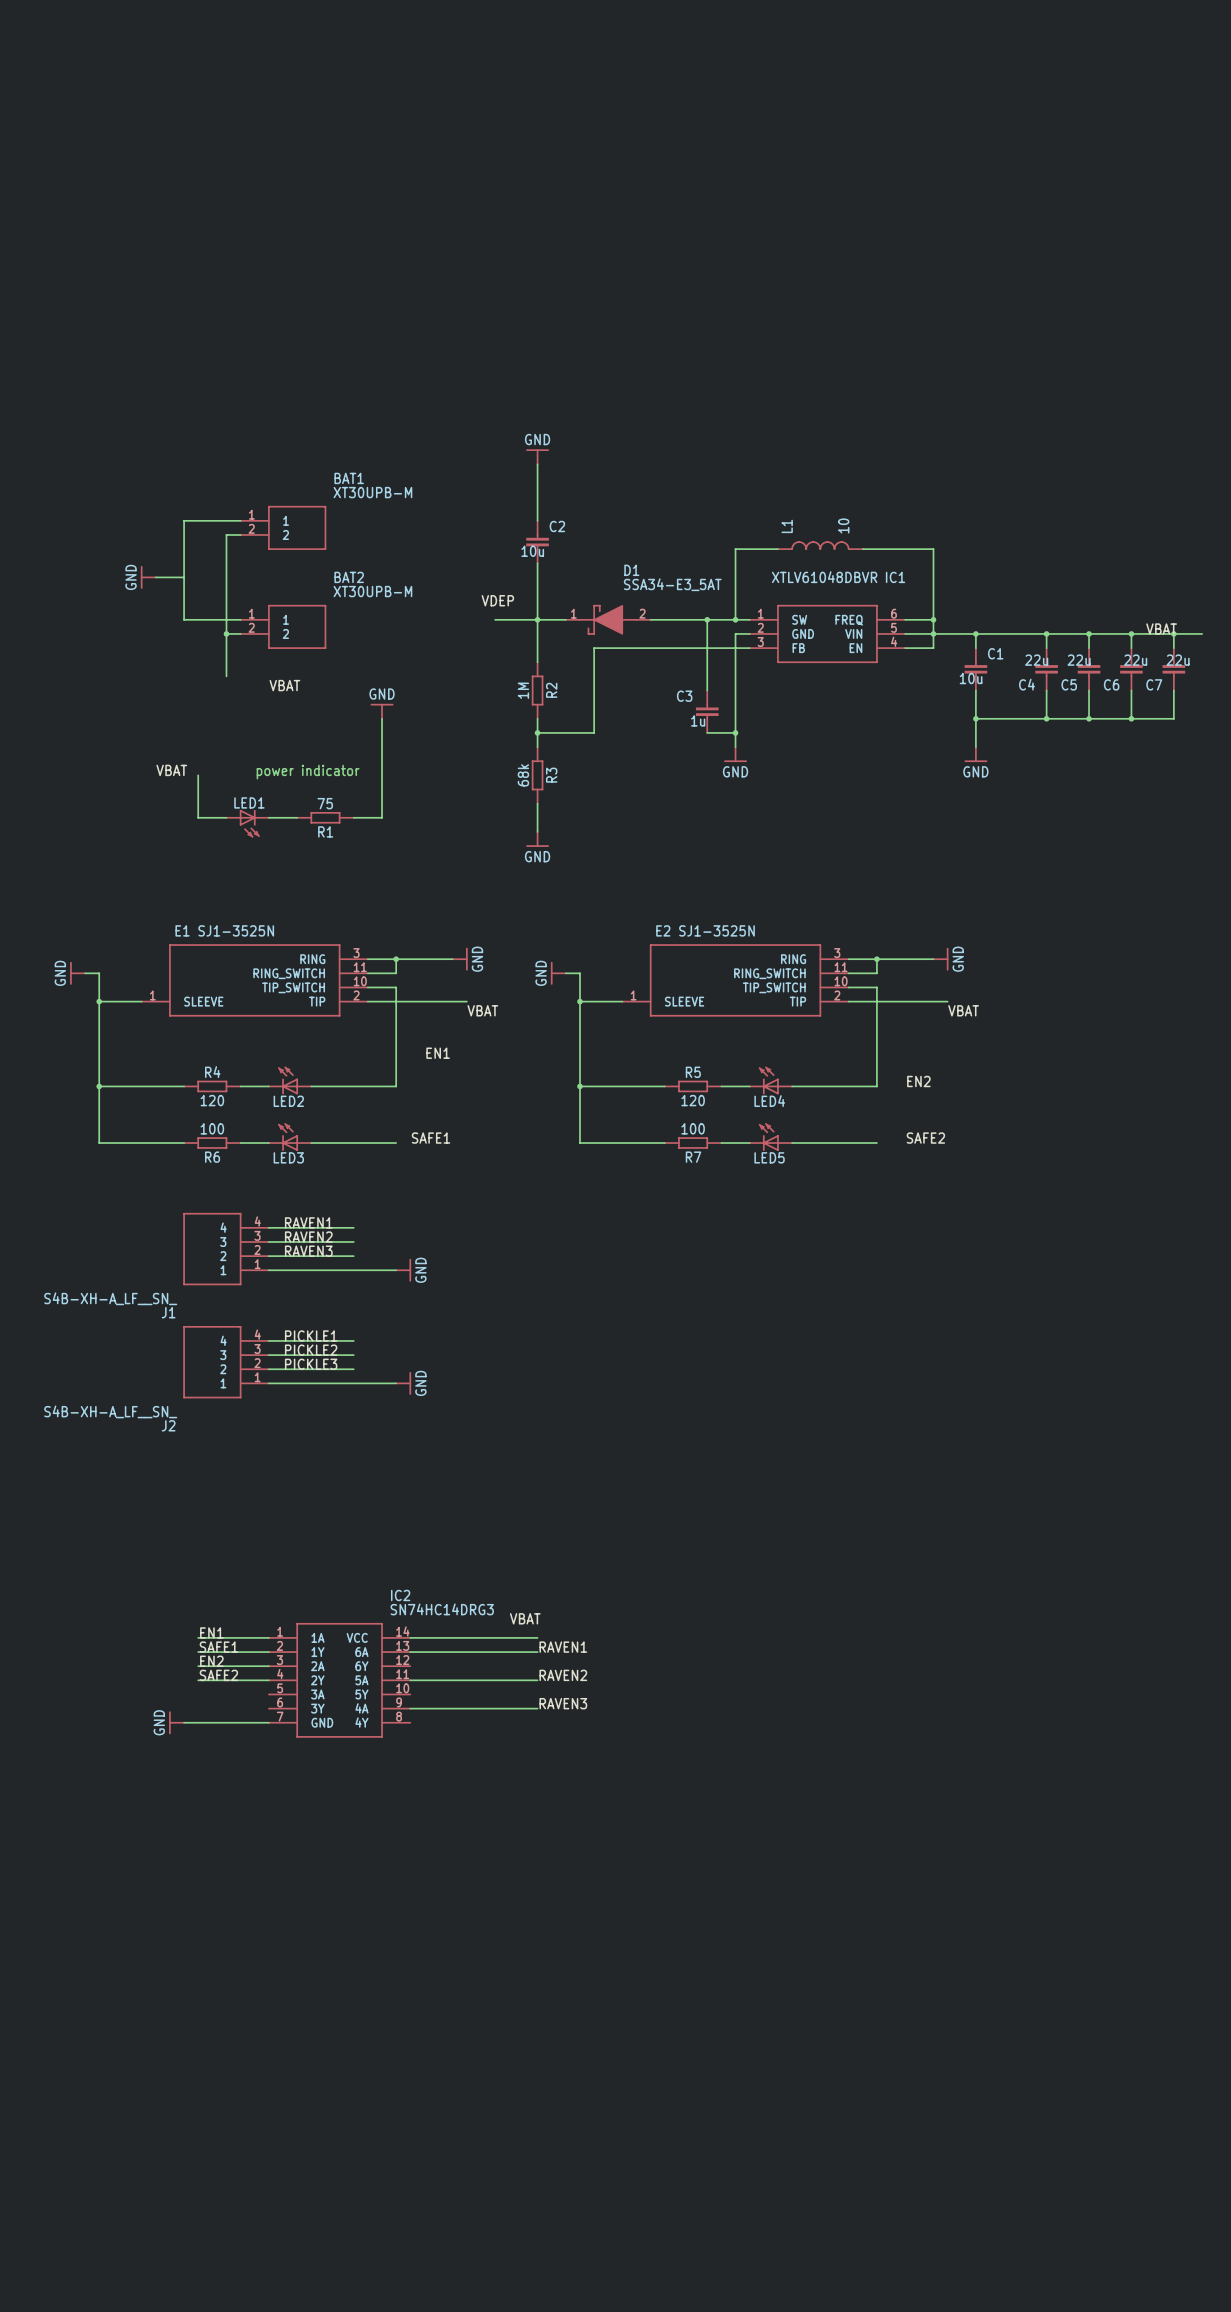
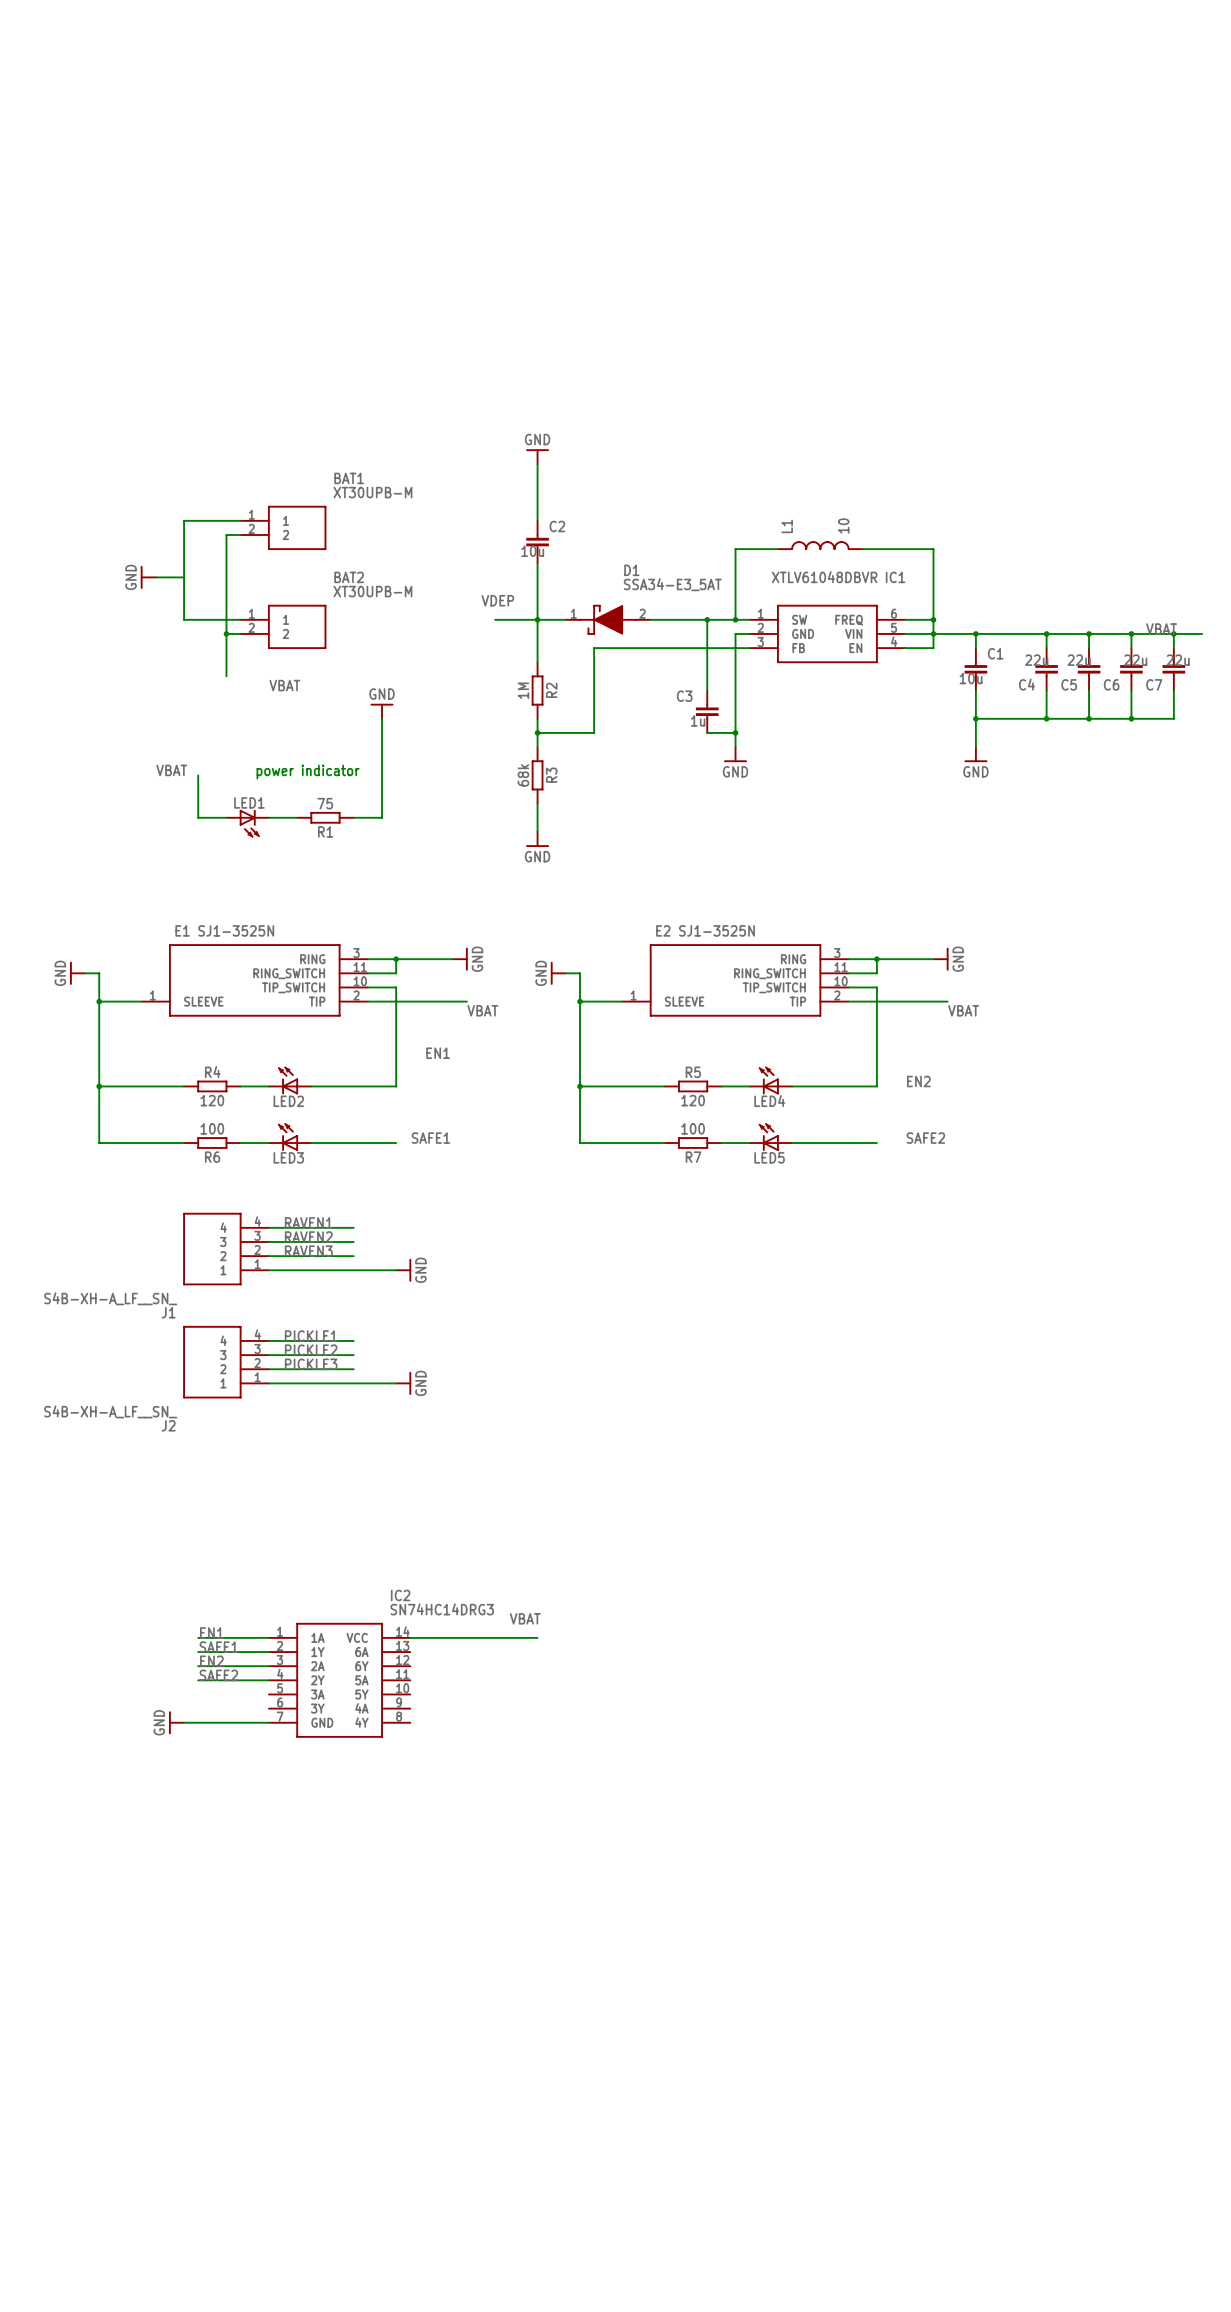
label: RAVEN1 (563, 1647) -> none
wire: (410, 1652) (537, 1652) -> none
label: RAVEN2 (563, 1675) -> none
wire: (410, 1680) (537, 1680) -> none
label: RAVEN3 (563, 1703) -> none
wire: (410, 1708) (537, 1708) -> none

